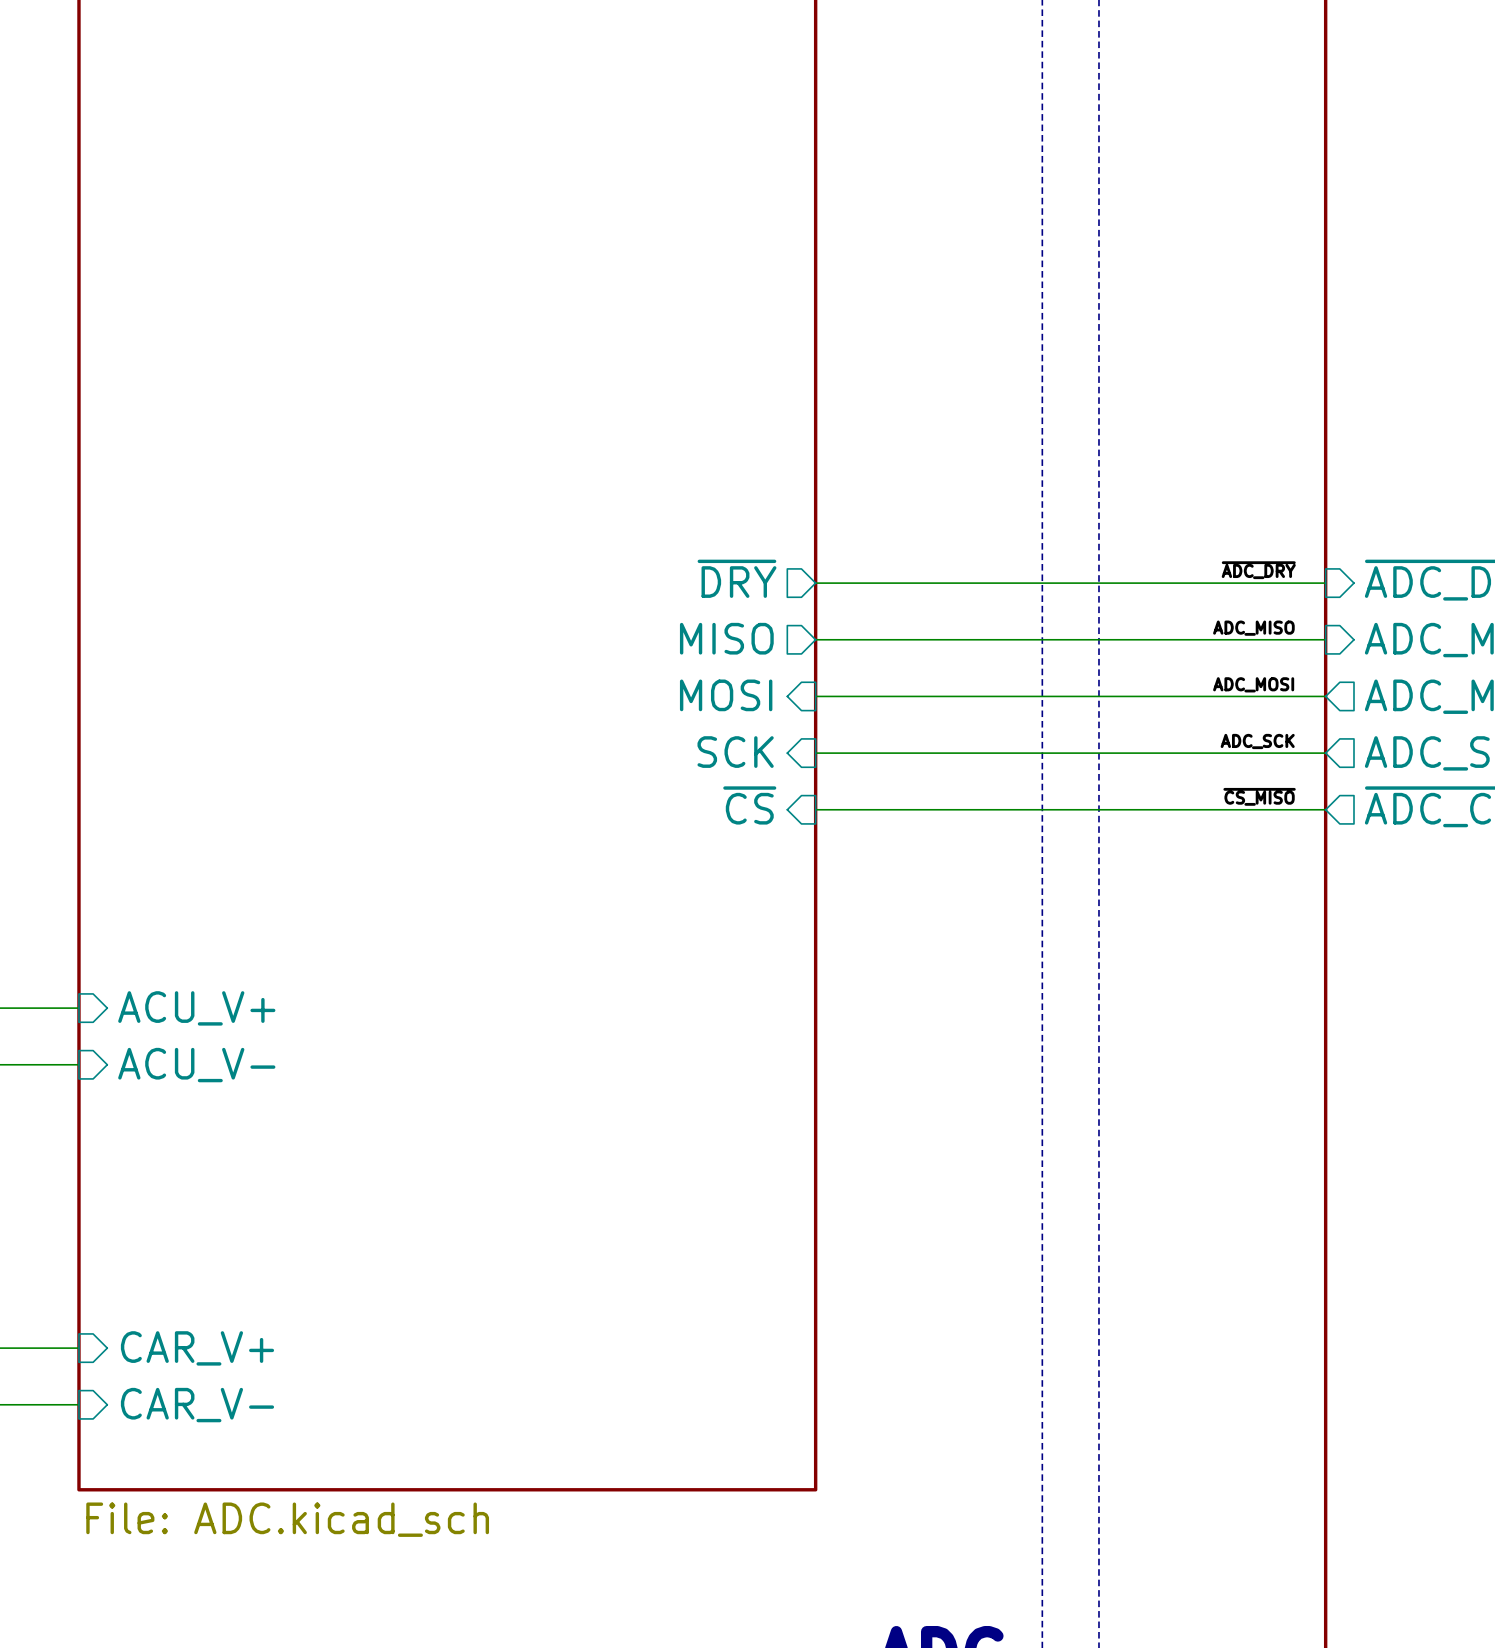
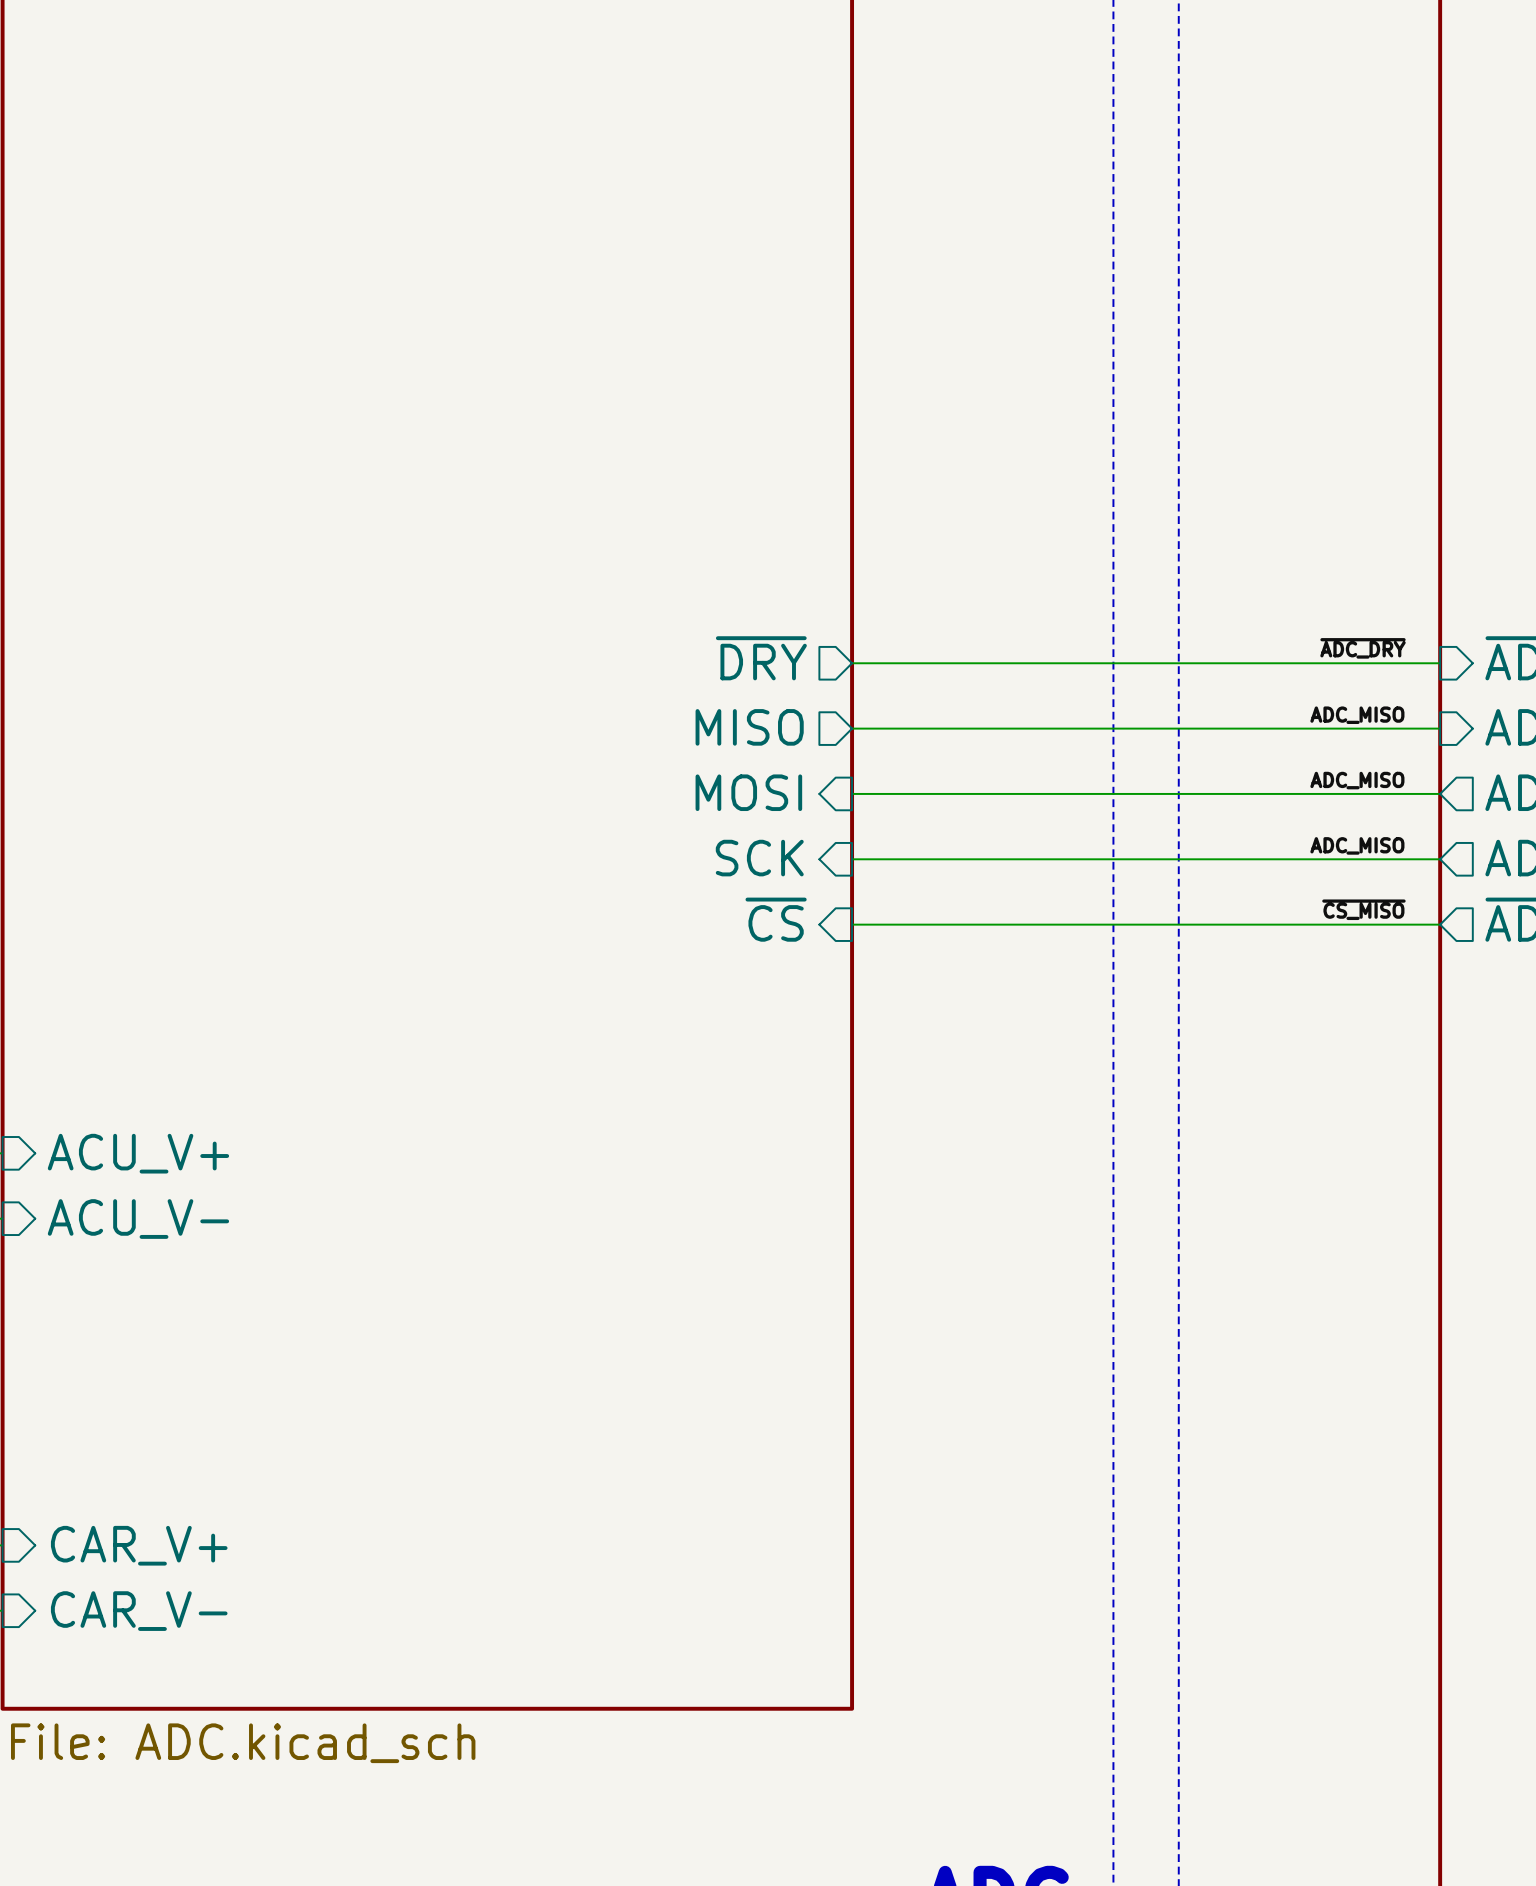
label: ADC_MOSI (1253, 684) -> ADC_MISO (1357, 780)
label: ADC_SCK (1257, 741) -> ADC_MISO (1357, 845)

